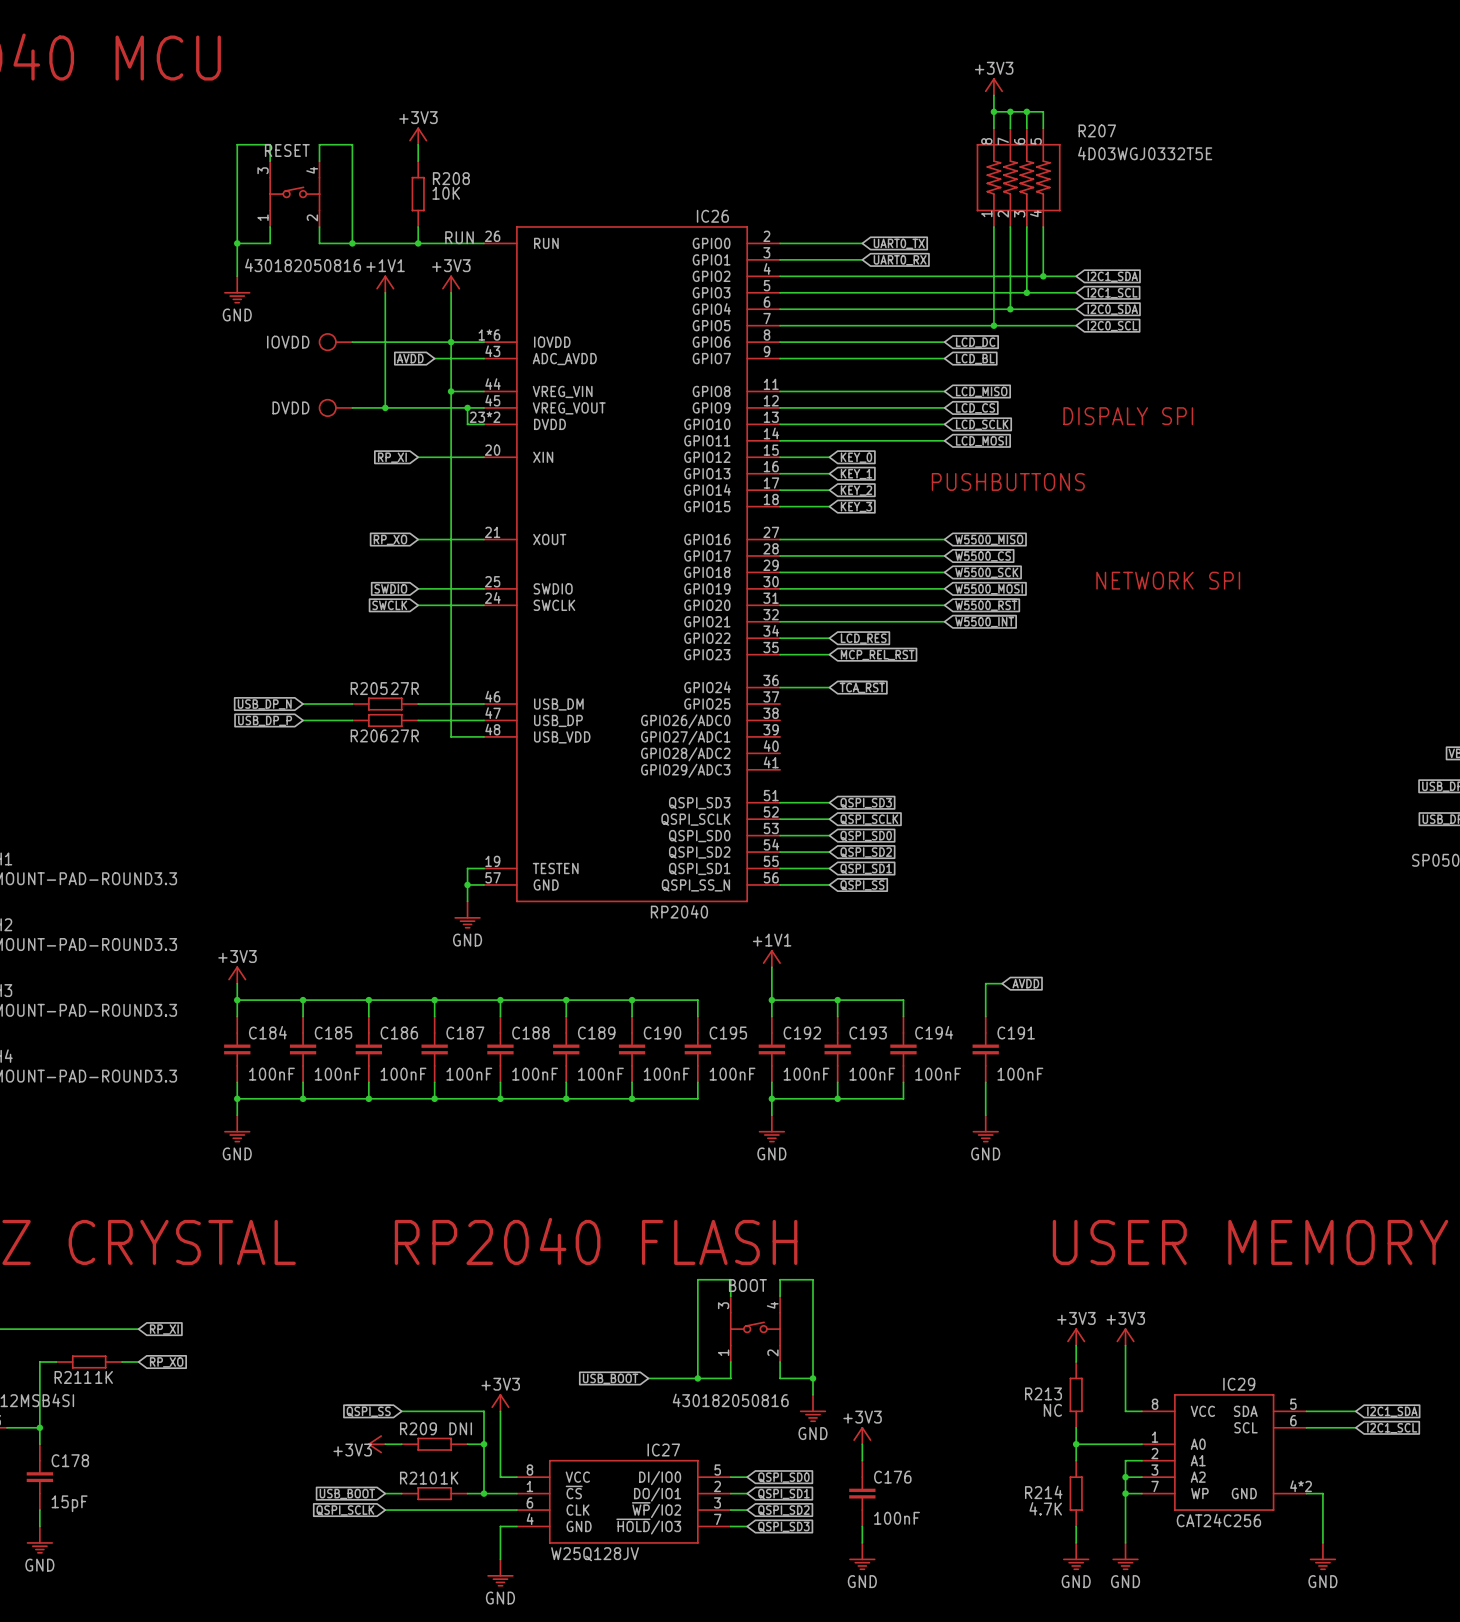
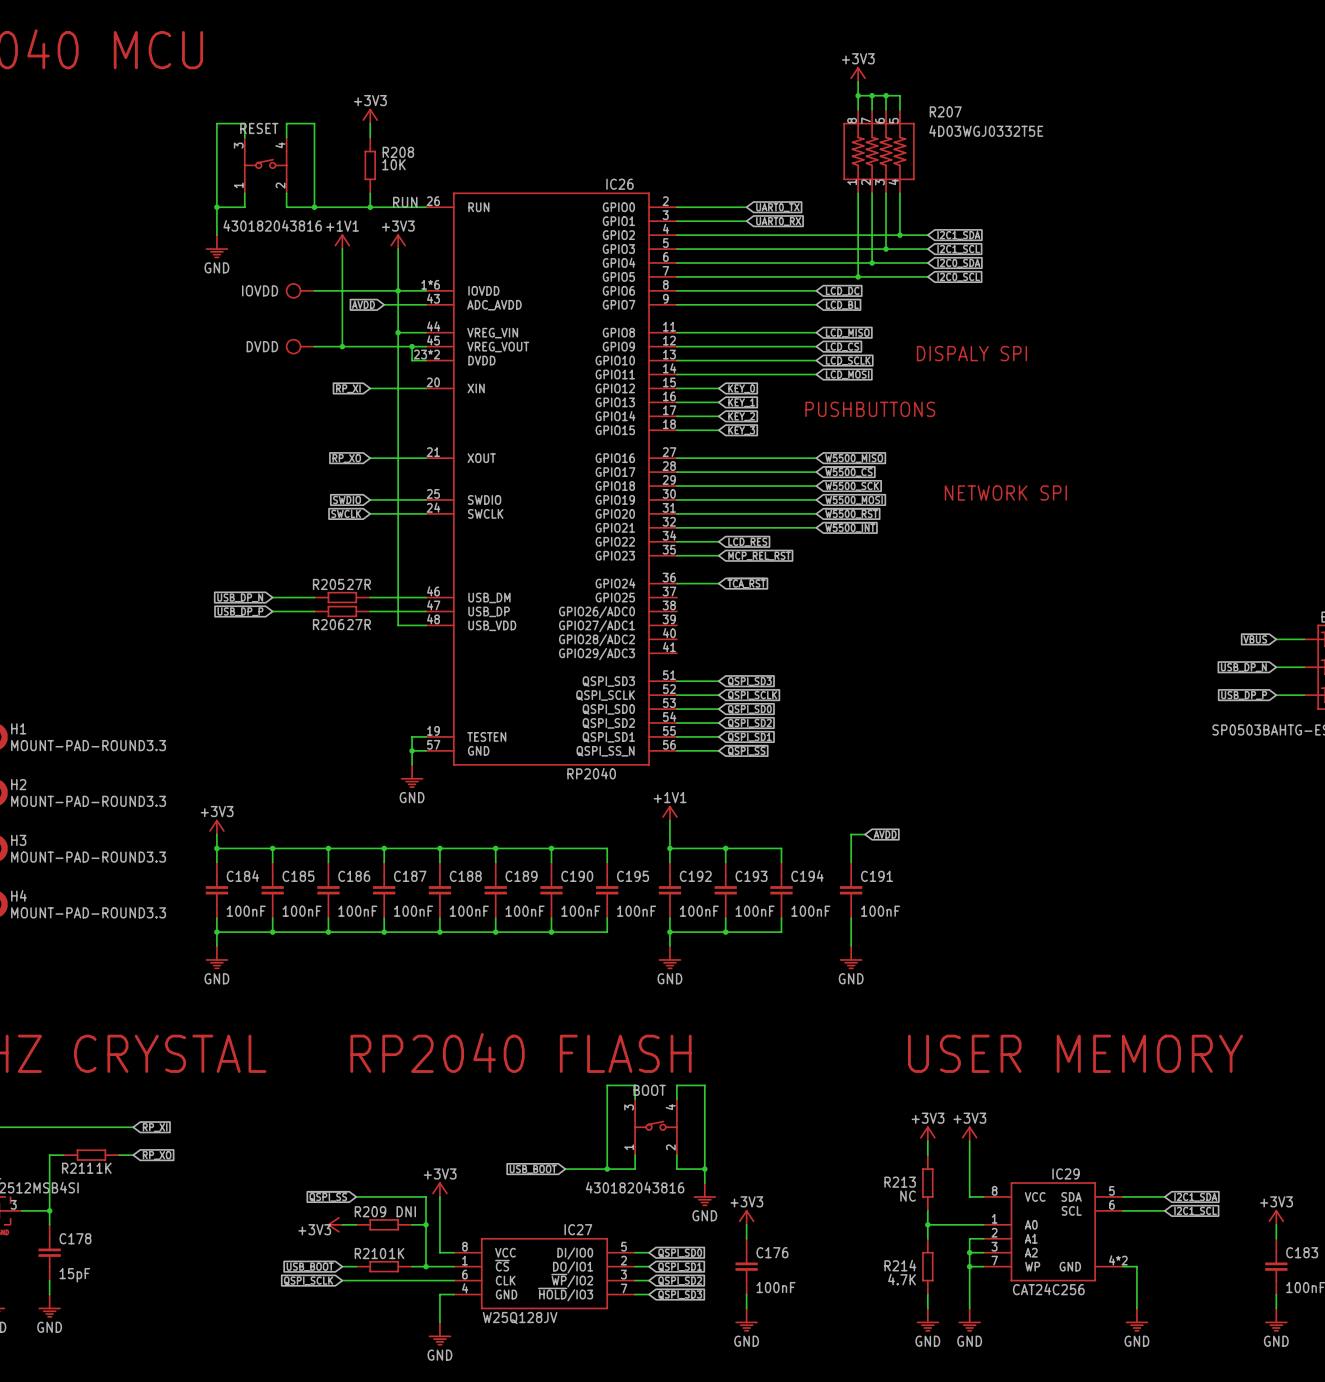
RESET value: 430182050816 (303, 265) -> 430182043816 (272, 225)
BOOT value: 430182050816 (730, 1400) -> 430182043816 (635, 1187)

